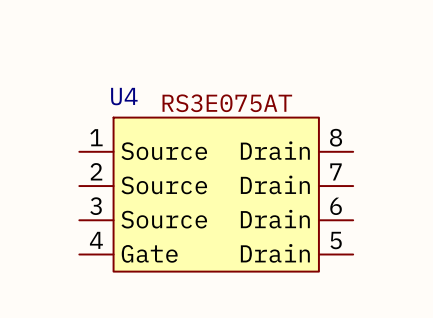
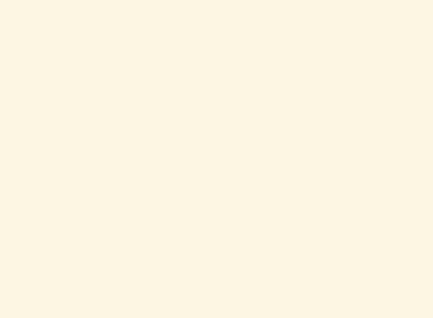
U4: (216, 194) -> none

